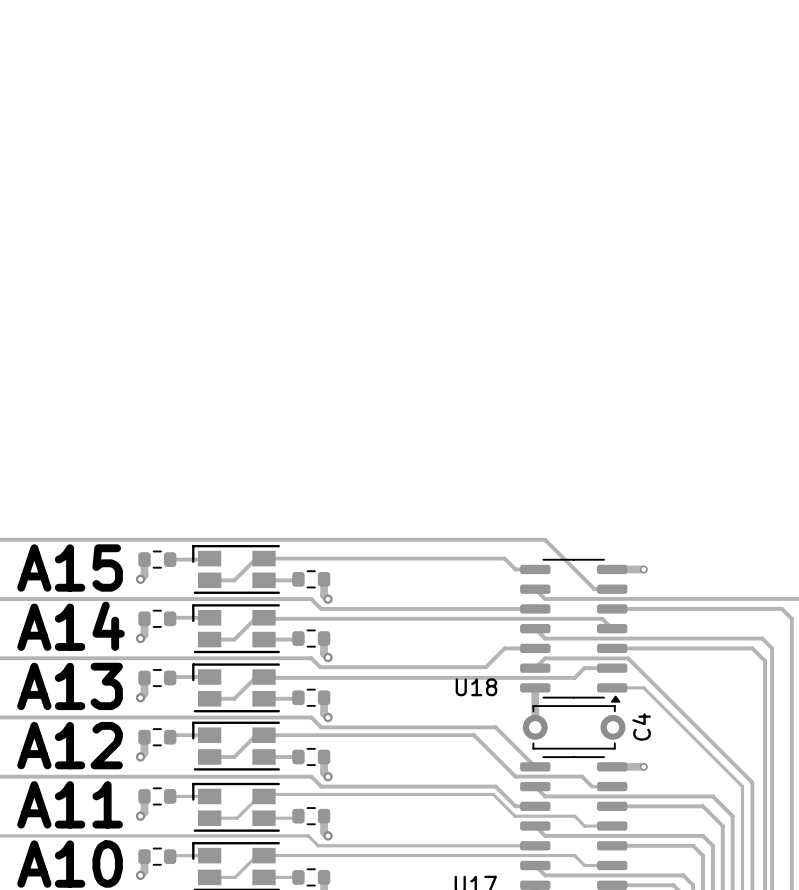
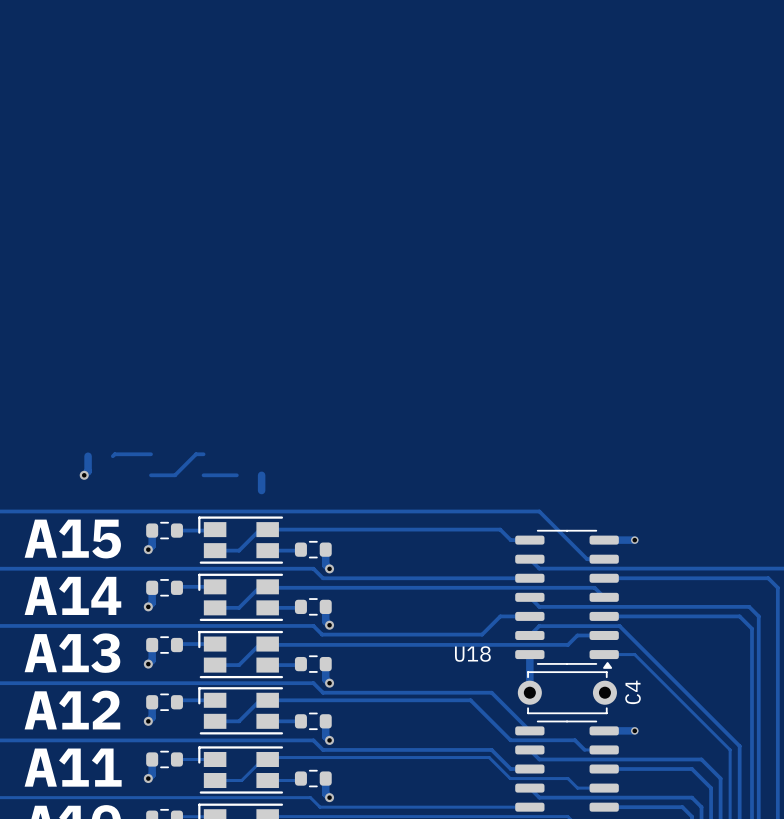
track: none -> (151, 454) (114, 454) (112, 456)
track: none -> (203, 454) (196, 454) (175, 475) (151, 475)
track: none -> (88, 456) (88, 471) (84, 475)
via: none -> (84, 475)
track: none -> (203, 475) (236, 475)
track: none -> (261, 475) (261, 490)

